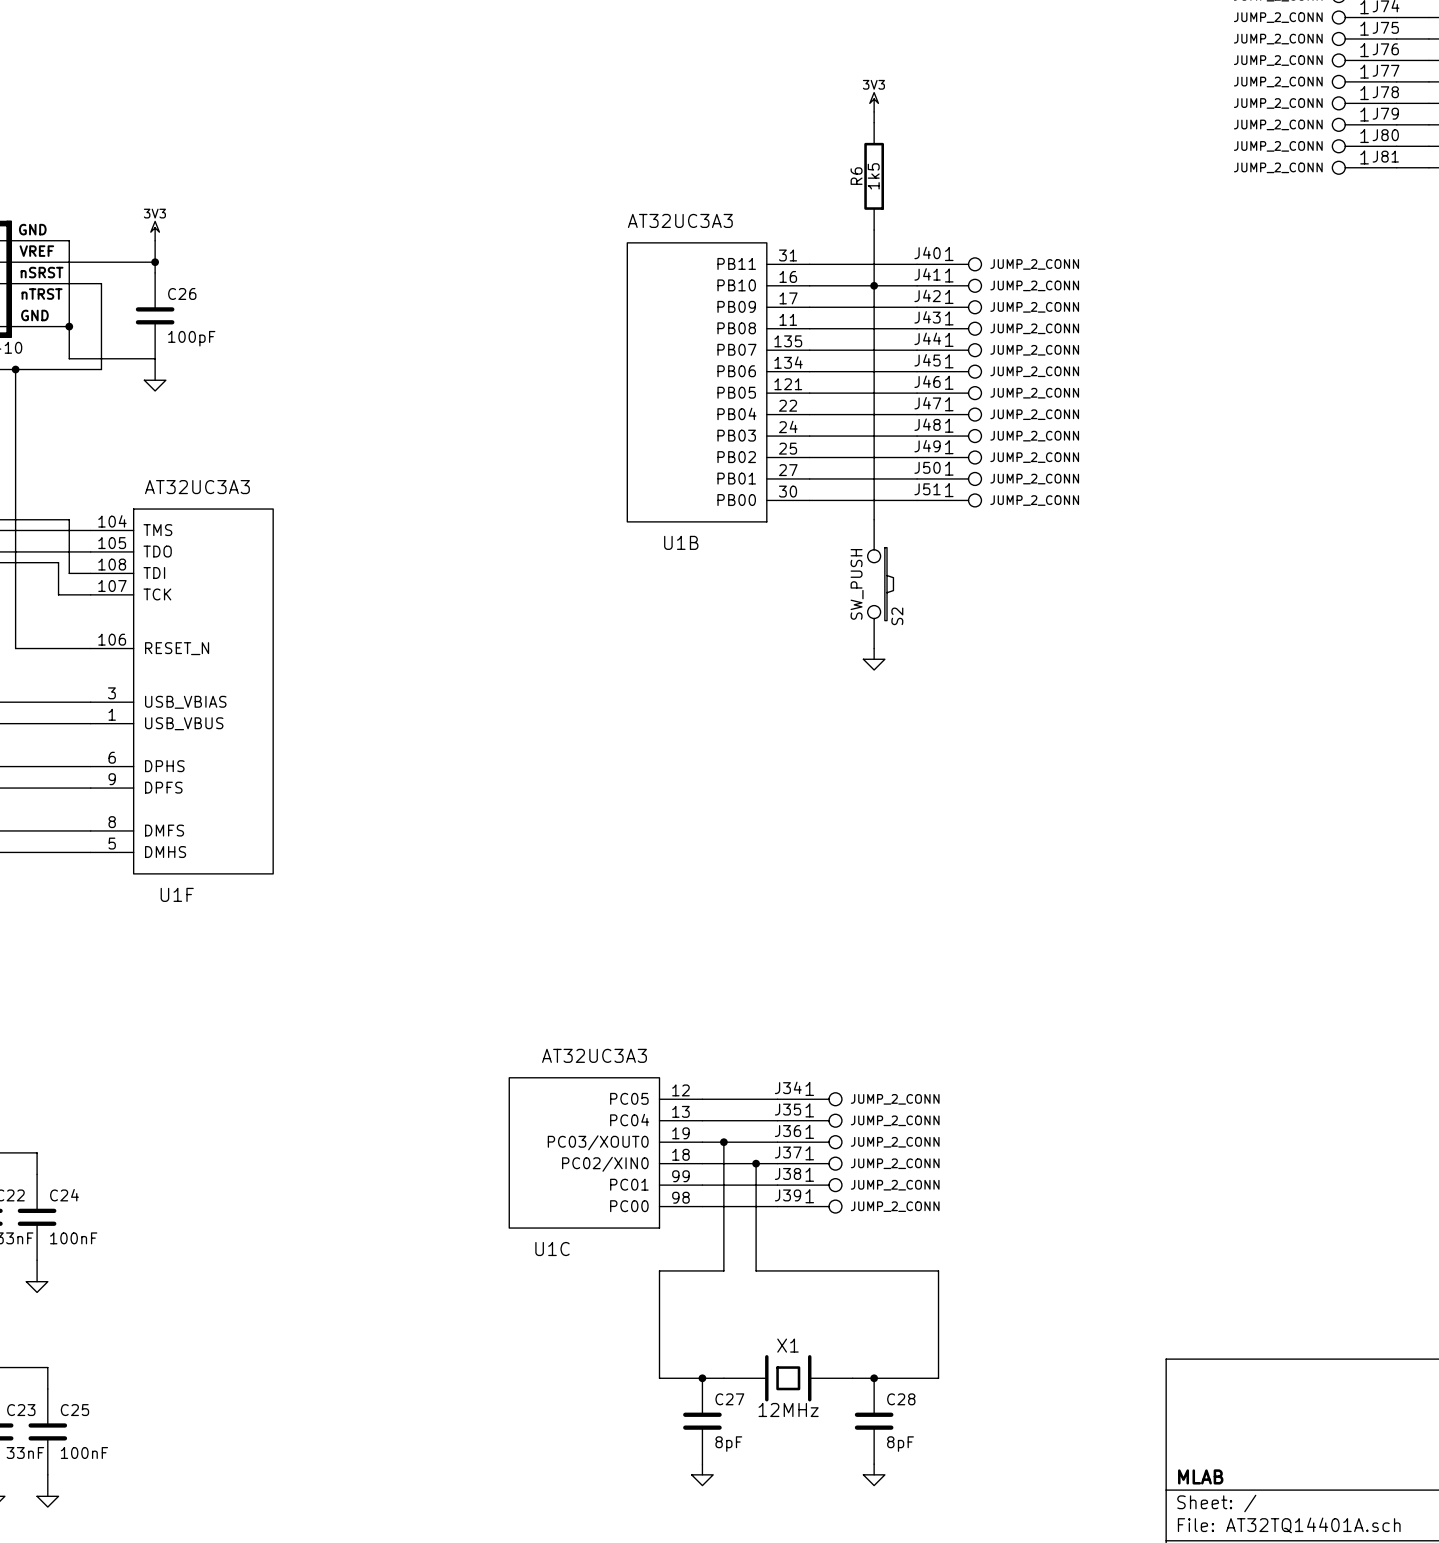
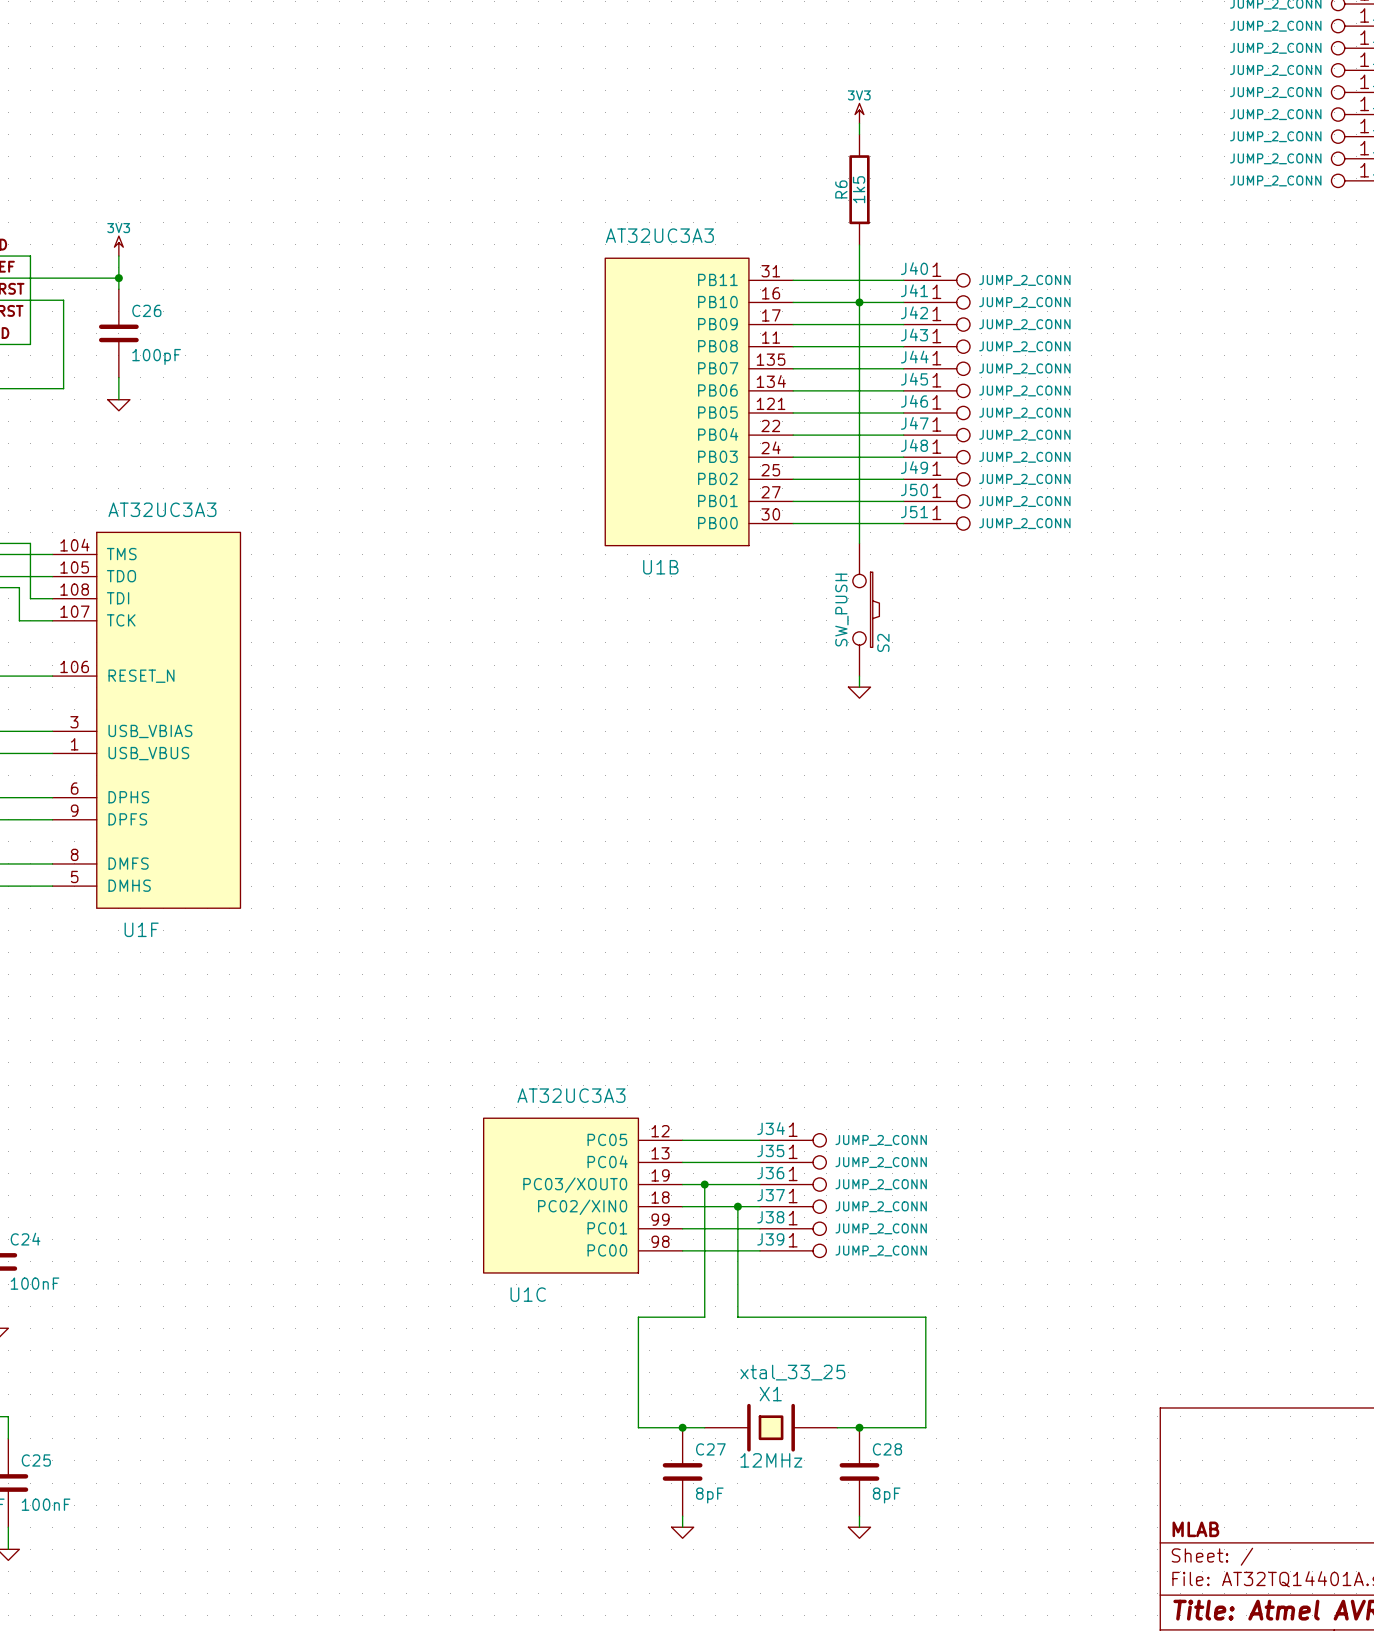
wire: (69, 326) (69, 358) (155, 358) -> none
junction: (69, 326) -> none
X1 text: none -> xtal_33_25 (792, 1372)

